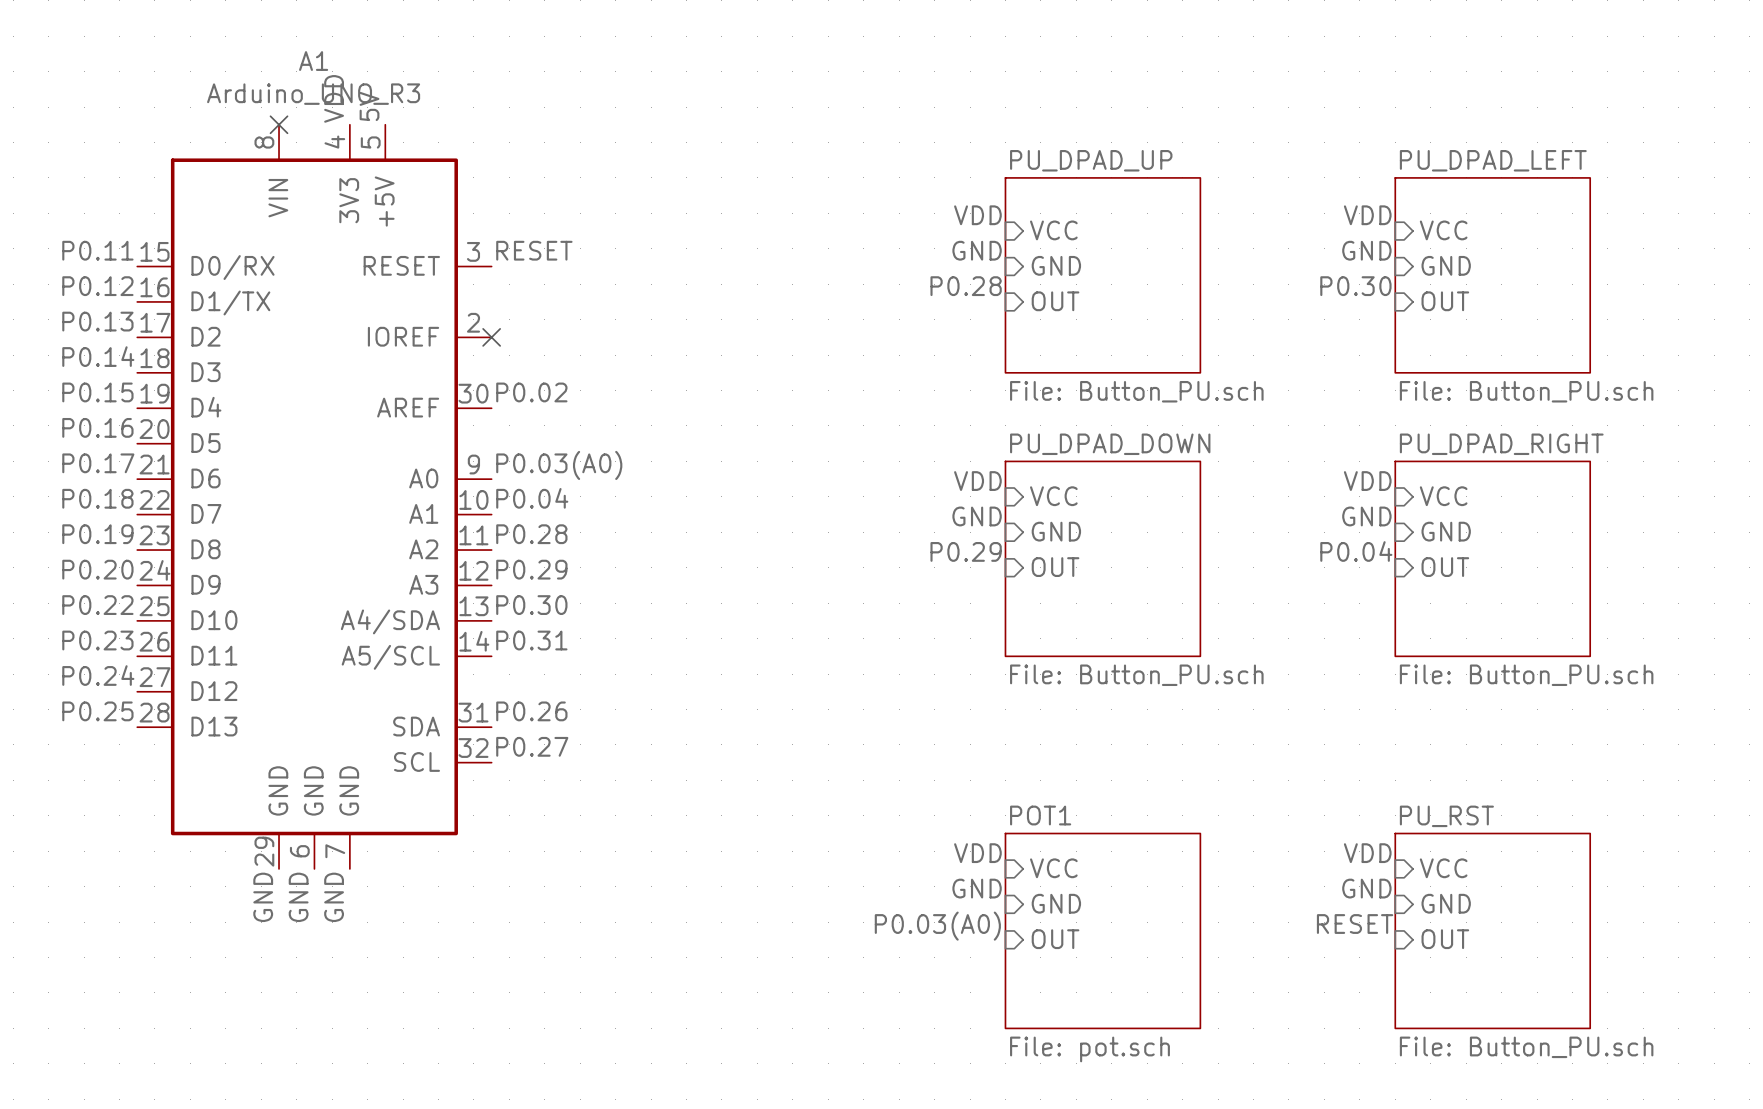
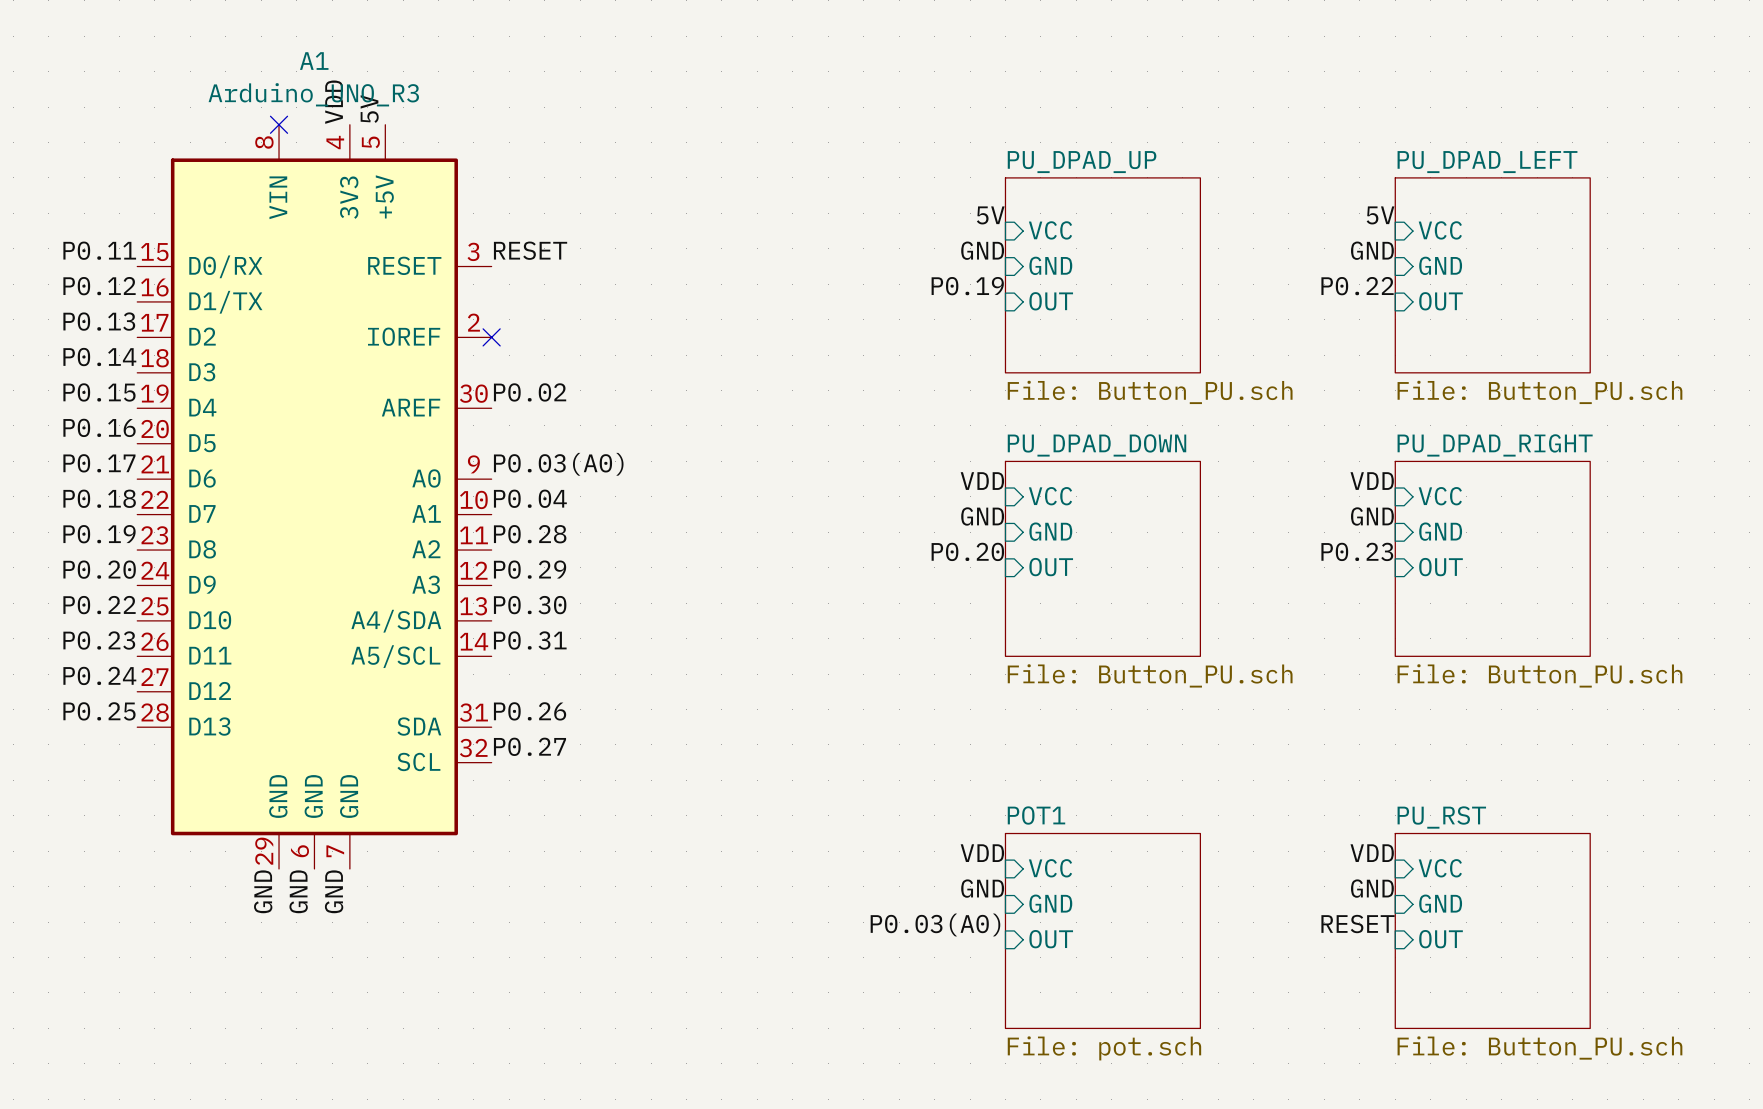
label: VDD (977, 215) -> 5V (990, 215)
label: VDD (1367, 215) -> 5V (1380, 215)
label: P0.28 (966, 286) -> P0.19 (967, 286)
label: P0.30 (1355, 286) -> P0.22 (1357, 286)
label: P0.29 (966, 551) -> P0.20 (967, 551)
label: P0.04 (1356, 551) -> P0.23 (1357, 551)

